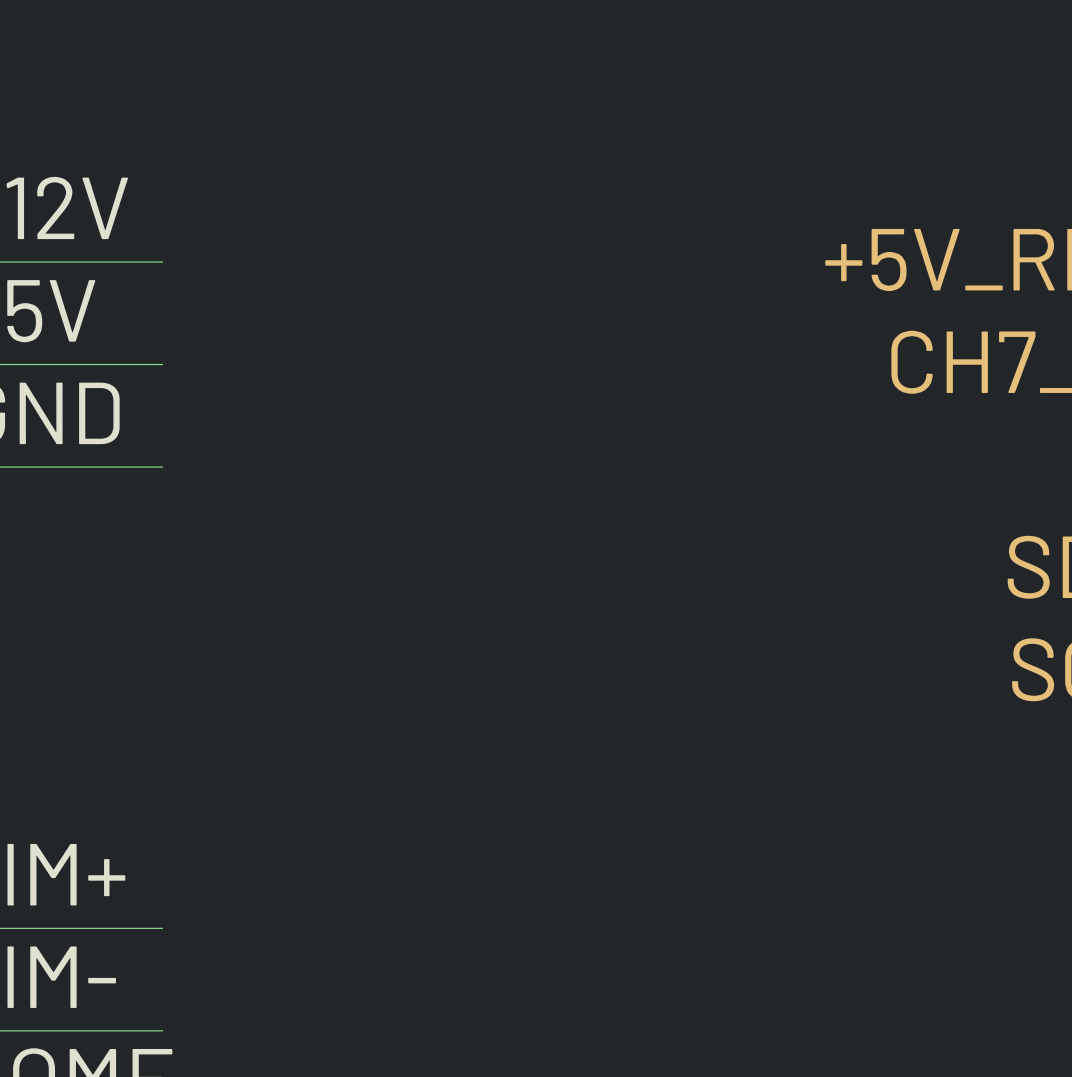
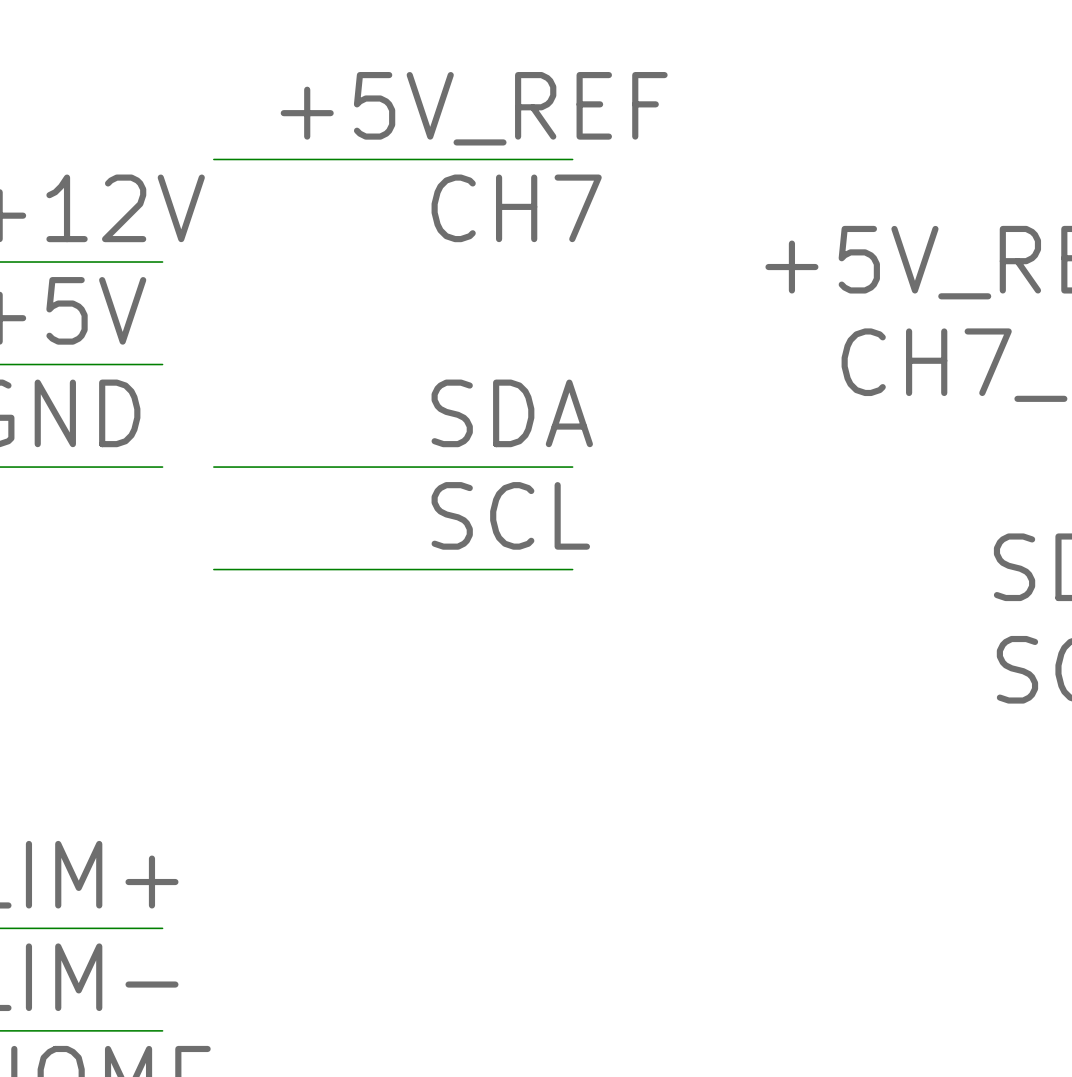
label: none -> +5V_REF (474, 108)
wire: none -> (213, 159) (572, 159)
label: none -> CH7 (516, 208)
label: none -> SDA (512, 413)
wire: none -> (213, 467) (572, 467)
label: none -> SCL (510, 515)
wire: none -> (213, 569) (572, 569)

